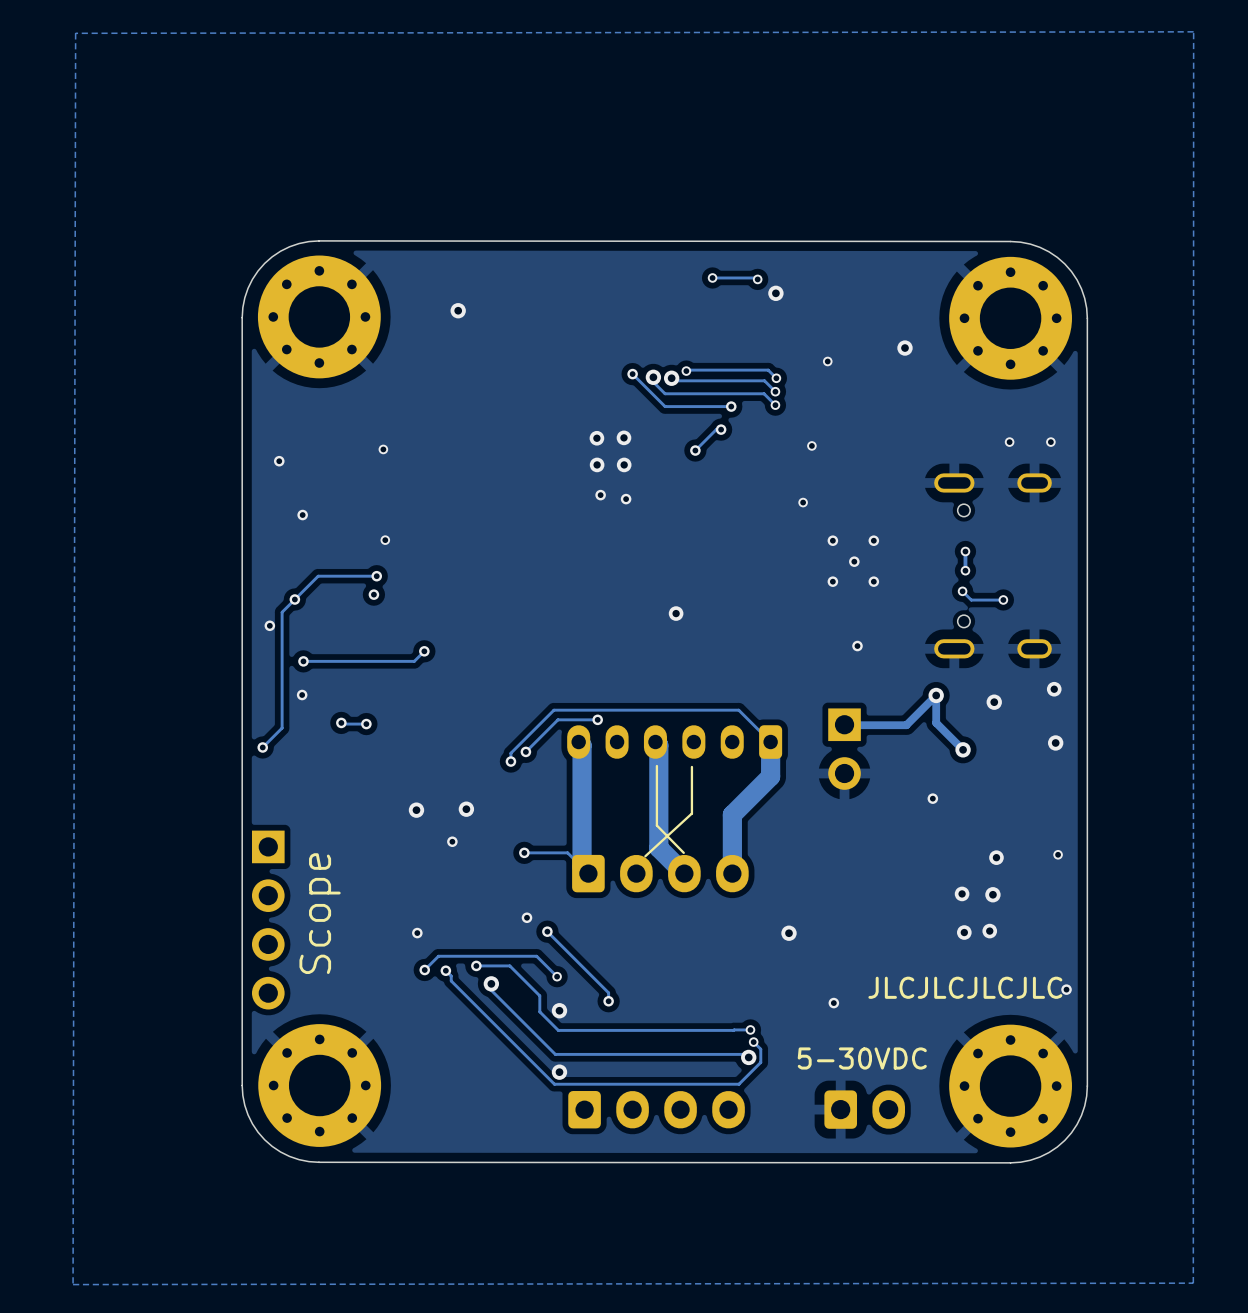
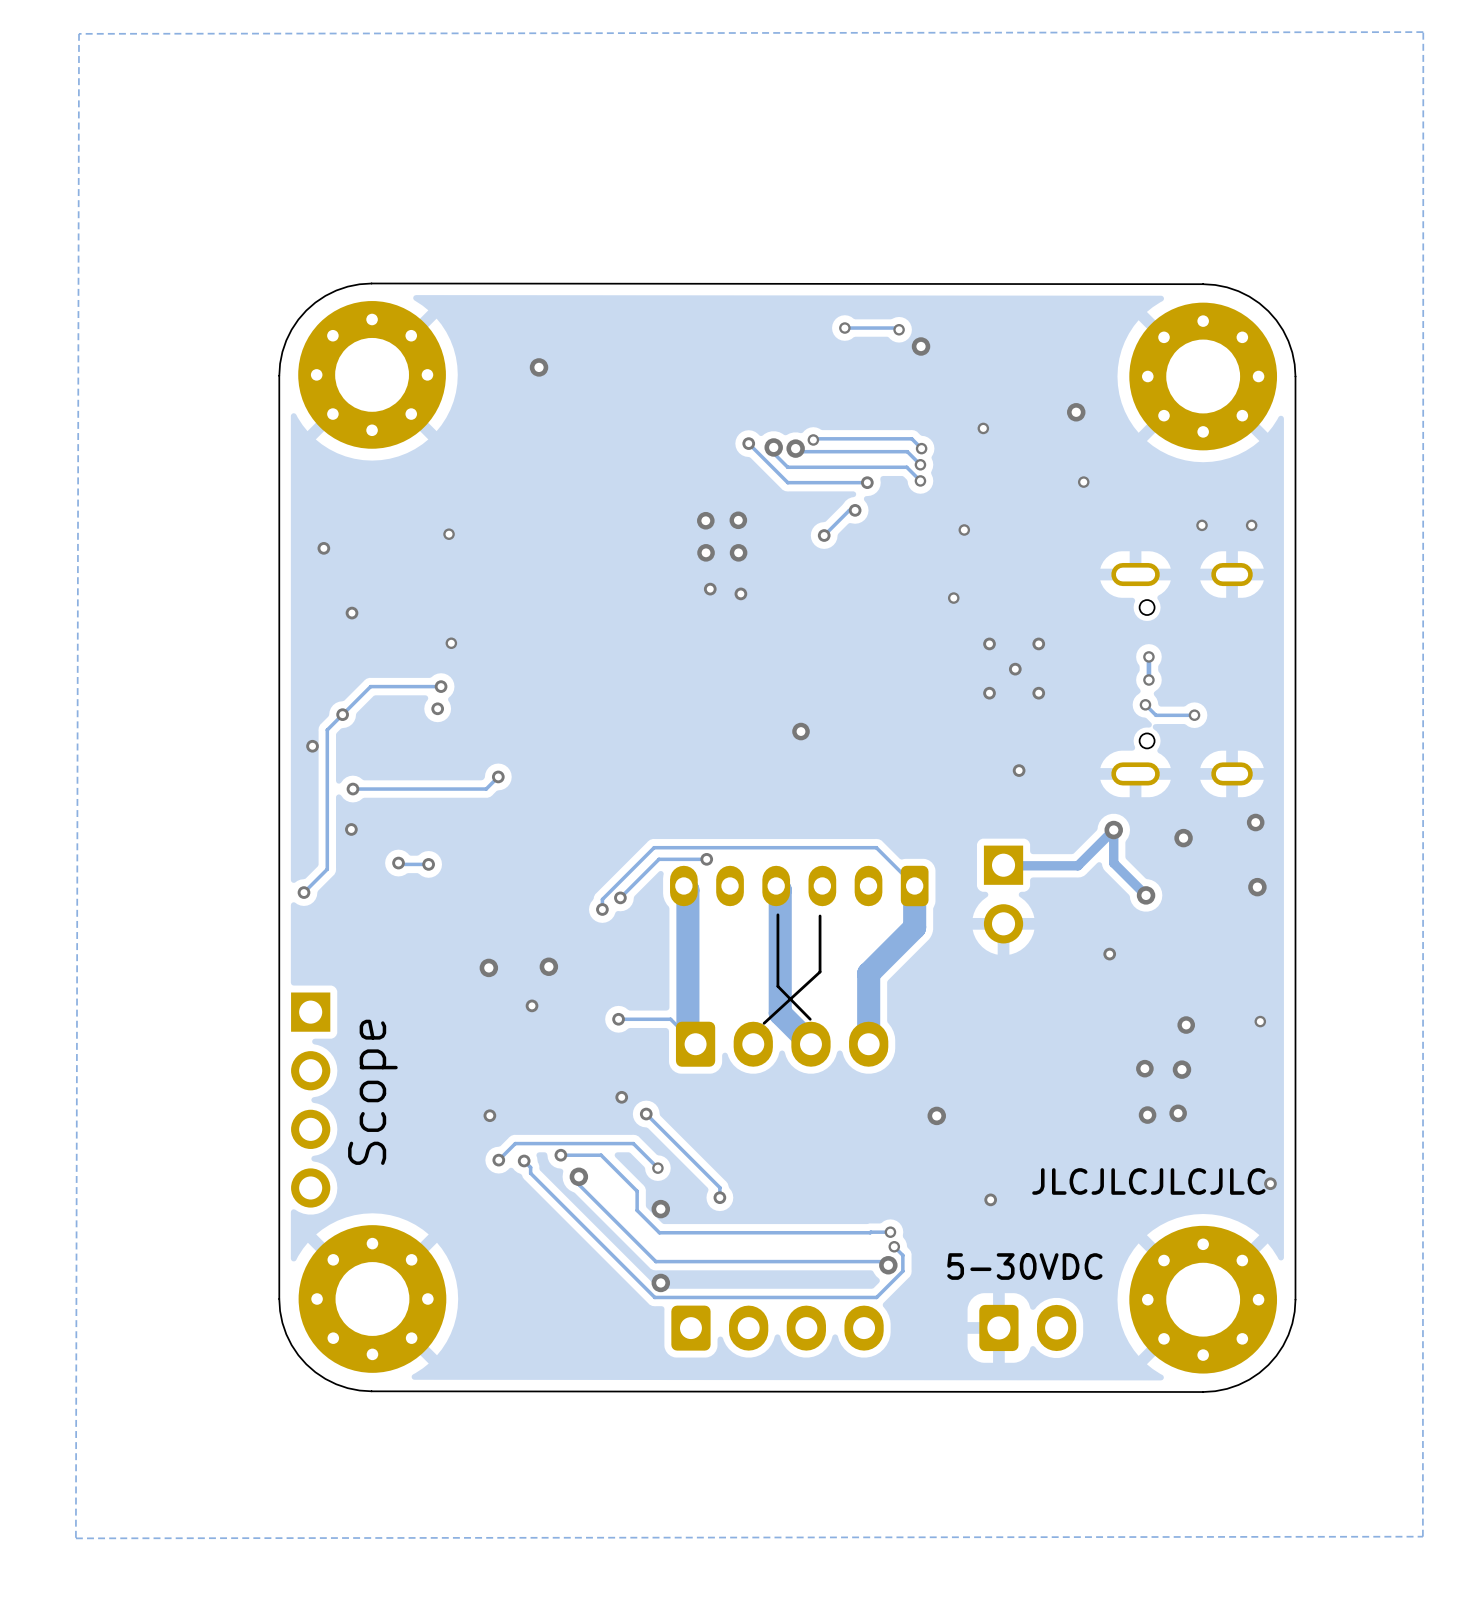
via: none -> (1083, 482)

